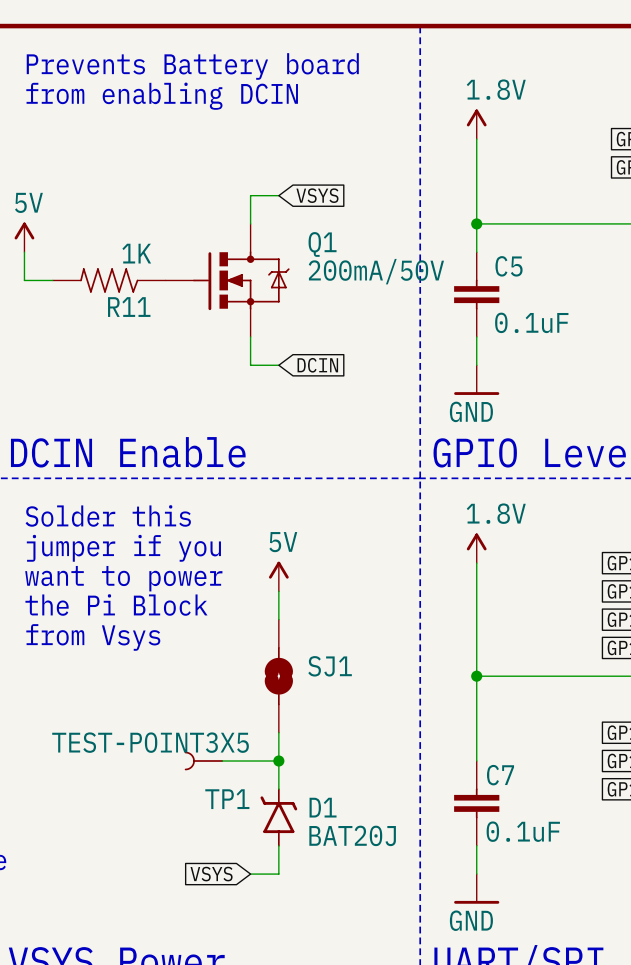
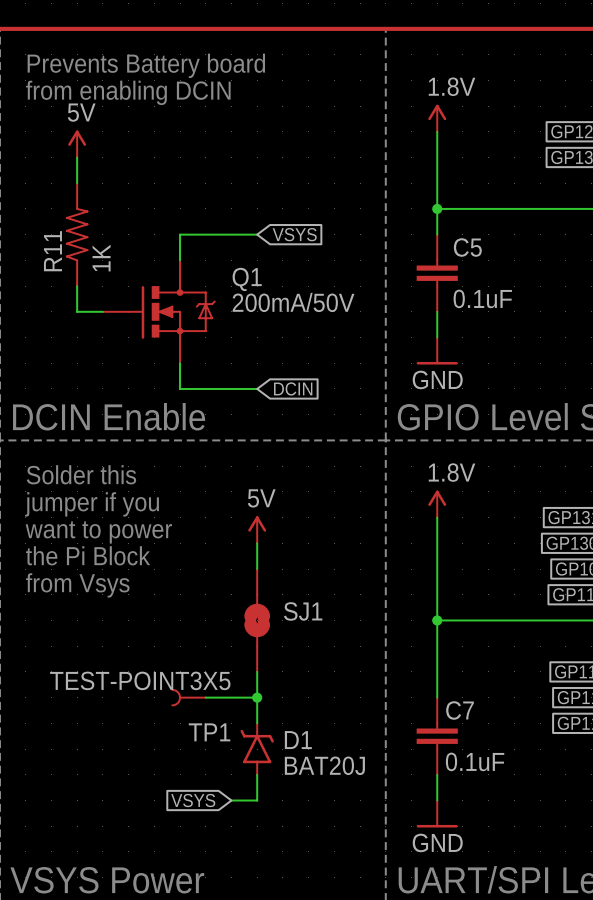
wire: none -> (77, 157) (77, 183)
wire: (278, 195) (250, 195) (250, 223) -> none
global label position: VSYS (317, 195) -> VSYS (294, 234)
power symbol position: 5V (24, 237) -> 5V (77, 143)
wire: (24, 252) (24, 280) (52, 280) -> (77, 286) (77, 311) (102, 311)
wire: none -> (257, 234) (180, 234) (180, 260)
R11 rotation: 0° (109, 280) -> 90° clockwise (77, 234)
Q1 position: (227, 280) -> (159, 311)
wire: (250, 337) (250, 365) (278, 365) -> none
global label position: DCIN (317, 365) -> DCIN (293, 388)
wire: none -> (180, 363) (180, 388) (257, 388)

